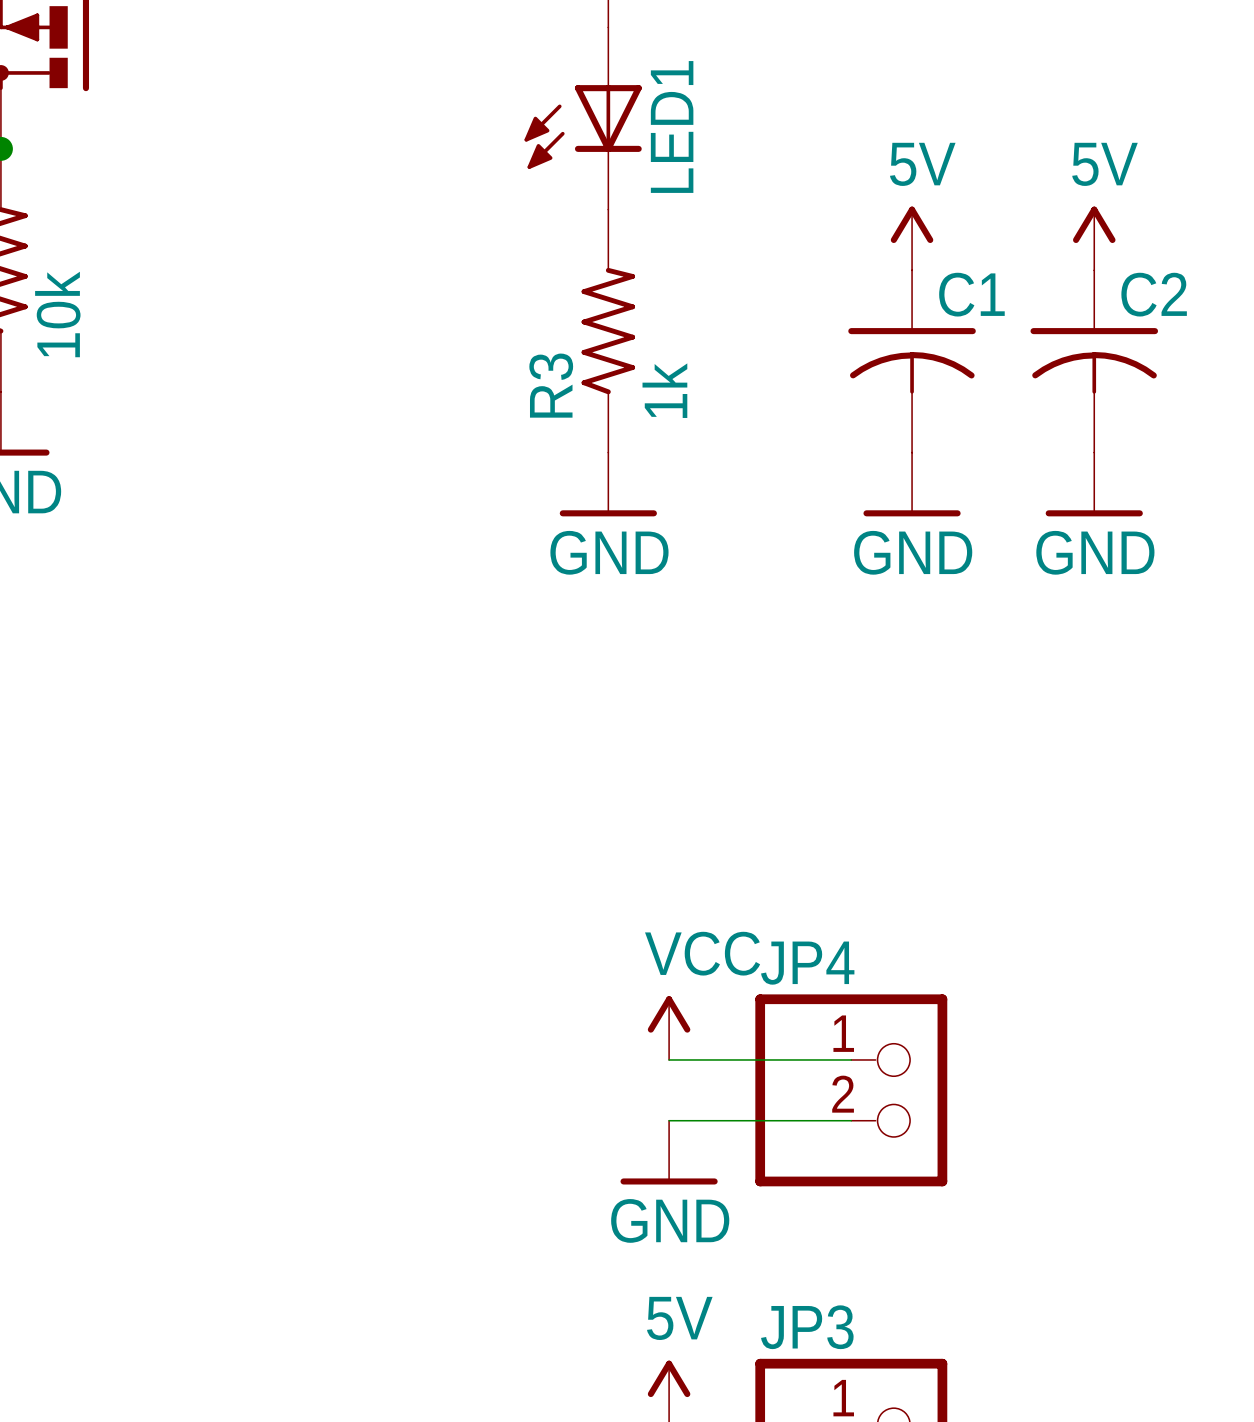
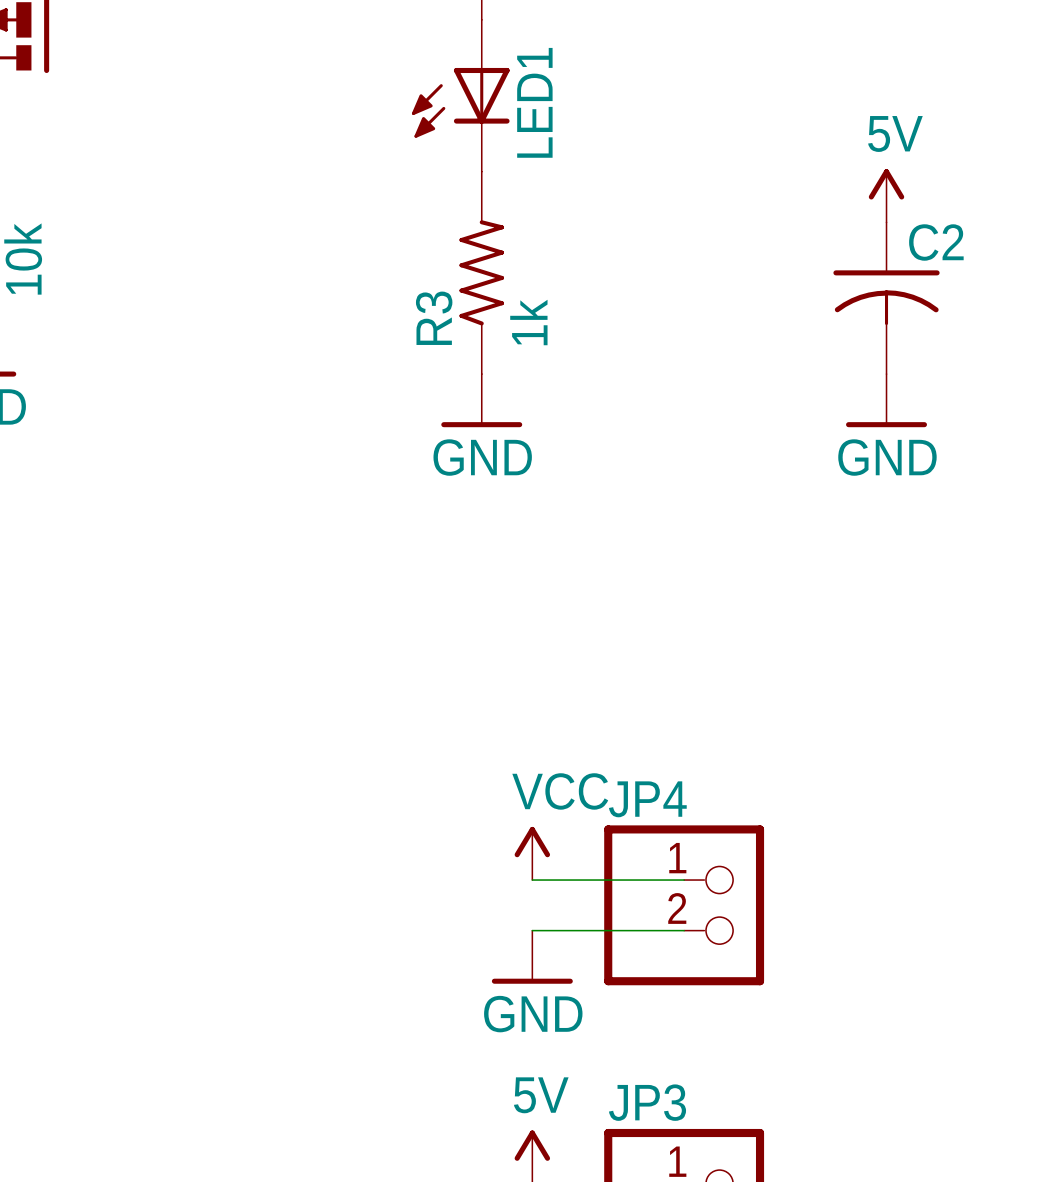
power symbol: 5V (912, 238) -> none
C1: (912, 361) -> none
power symbol: GND (912, 484) -> none

